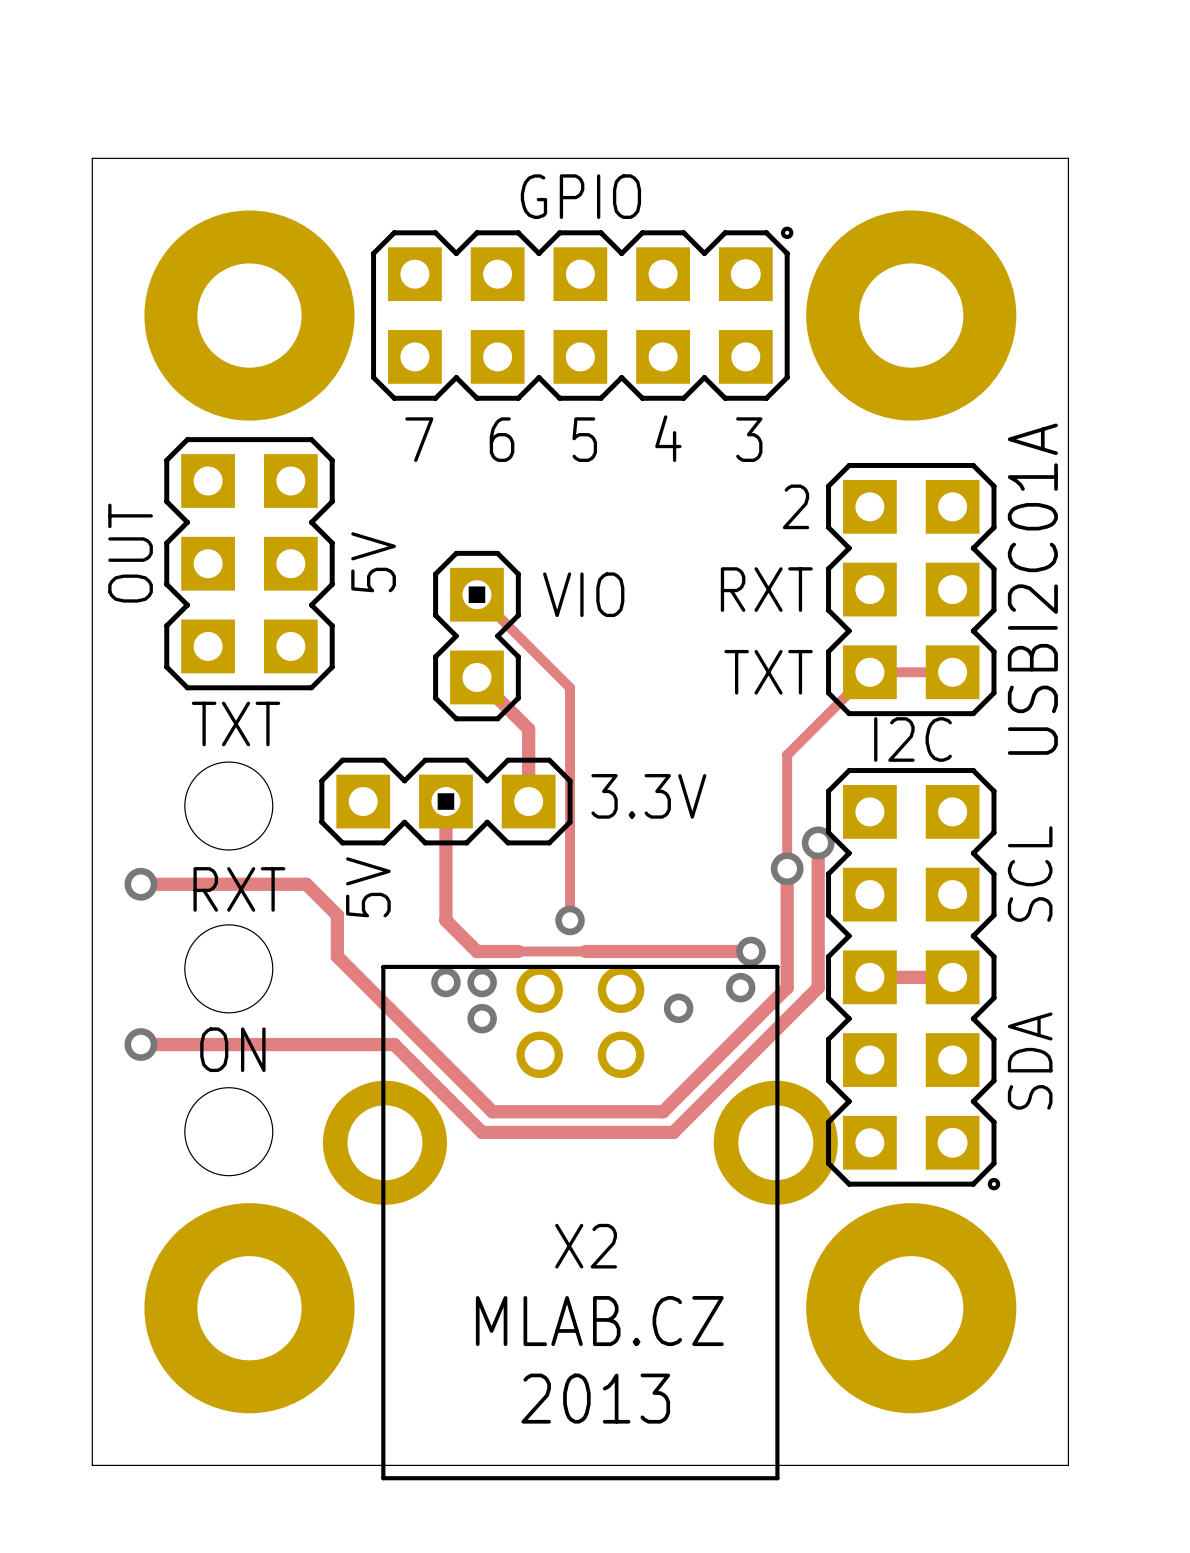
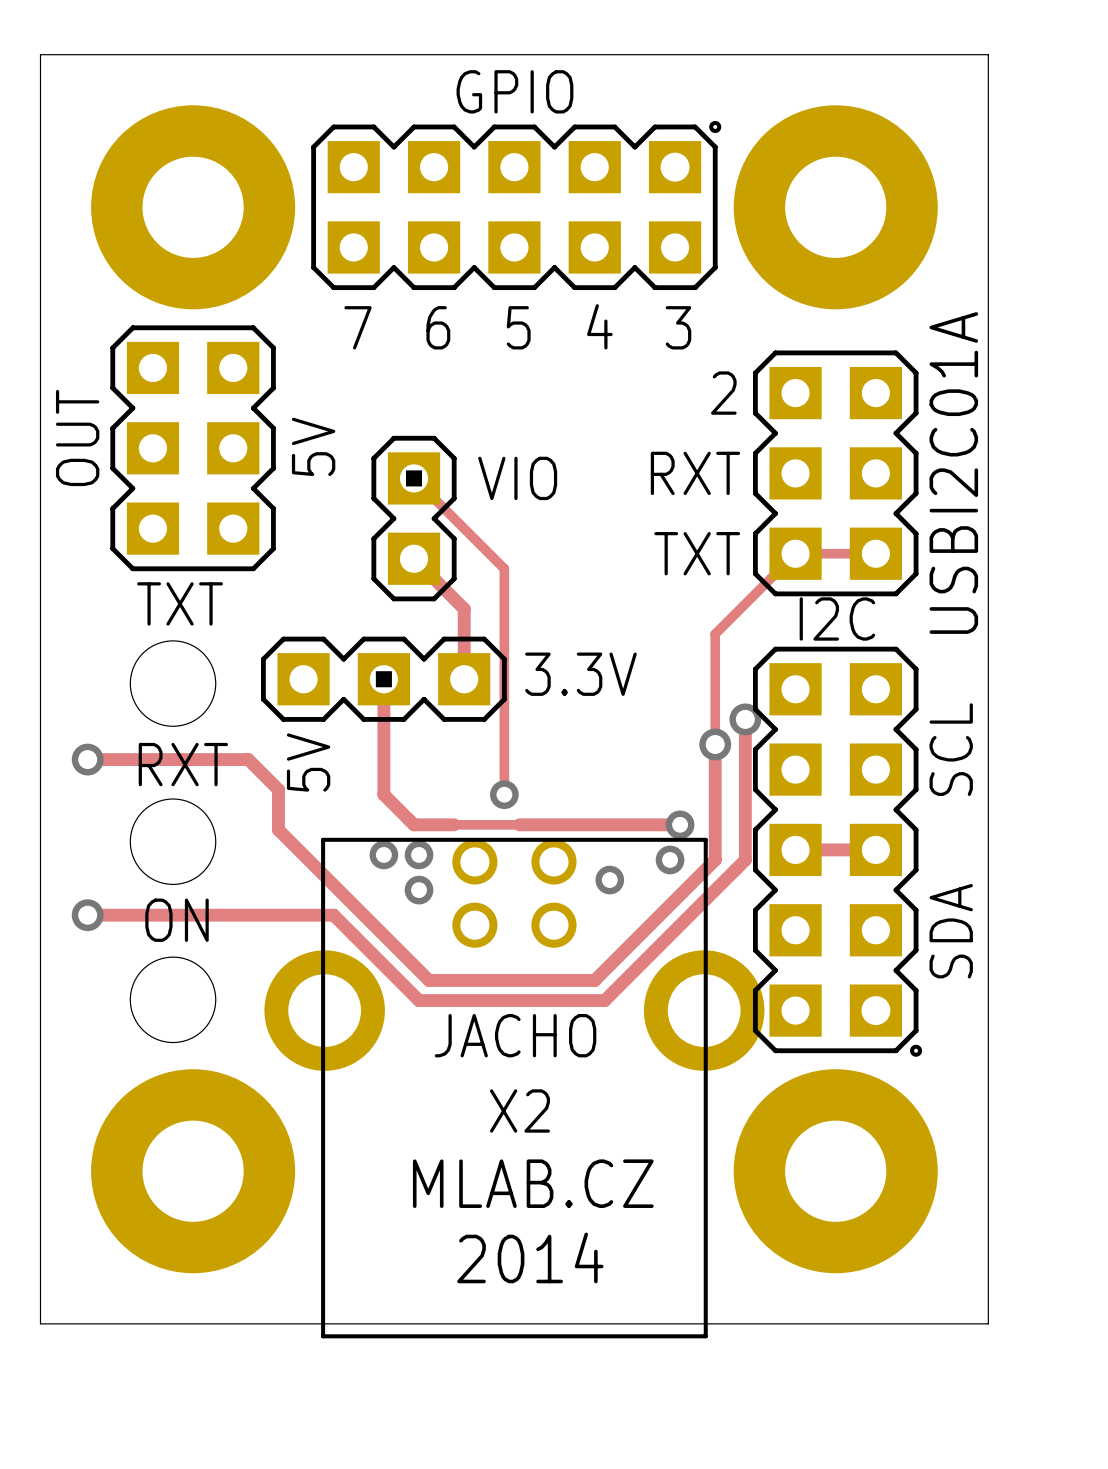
text: none -> JACHO (515, 1035)
text: 2013 (595, 1398) -> 2014 (530, 1257)

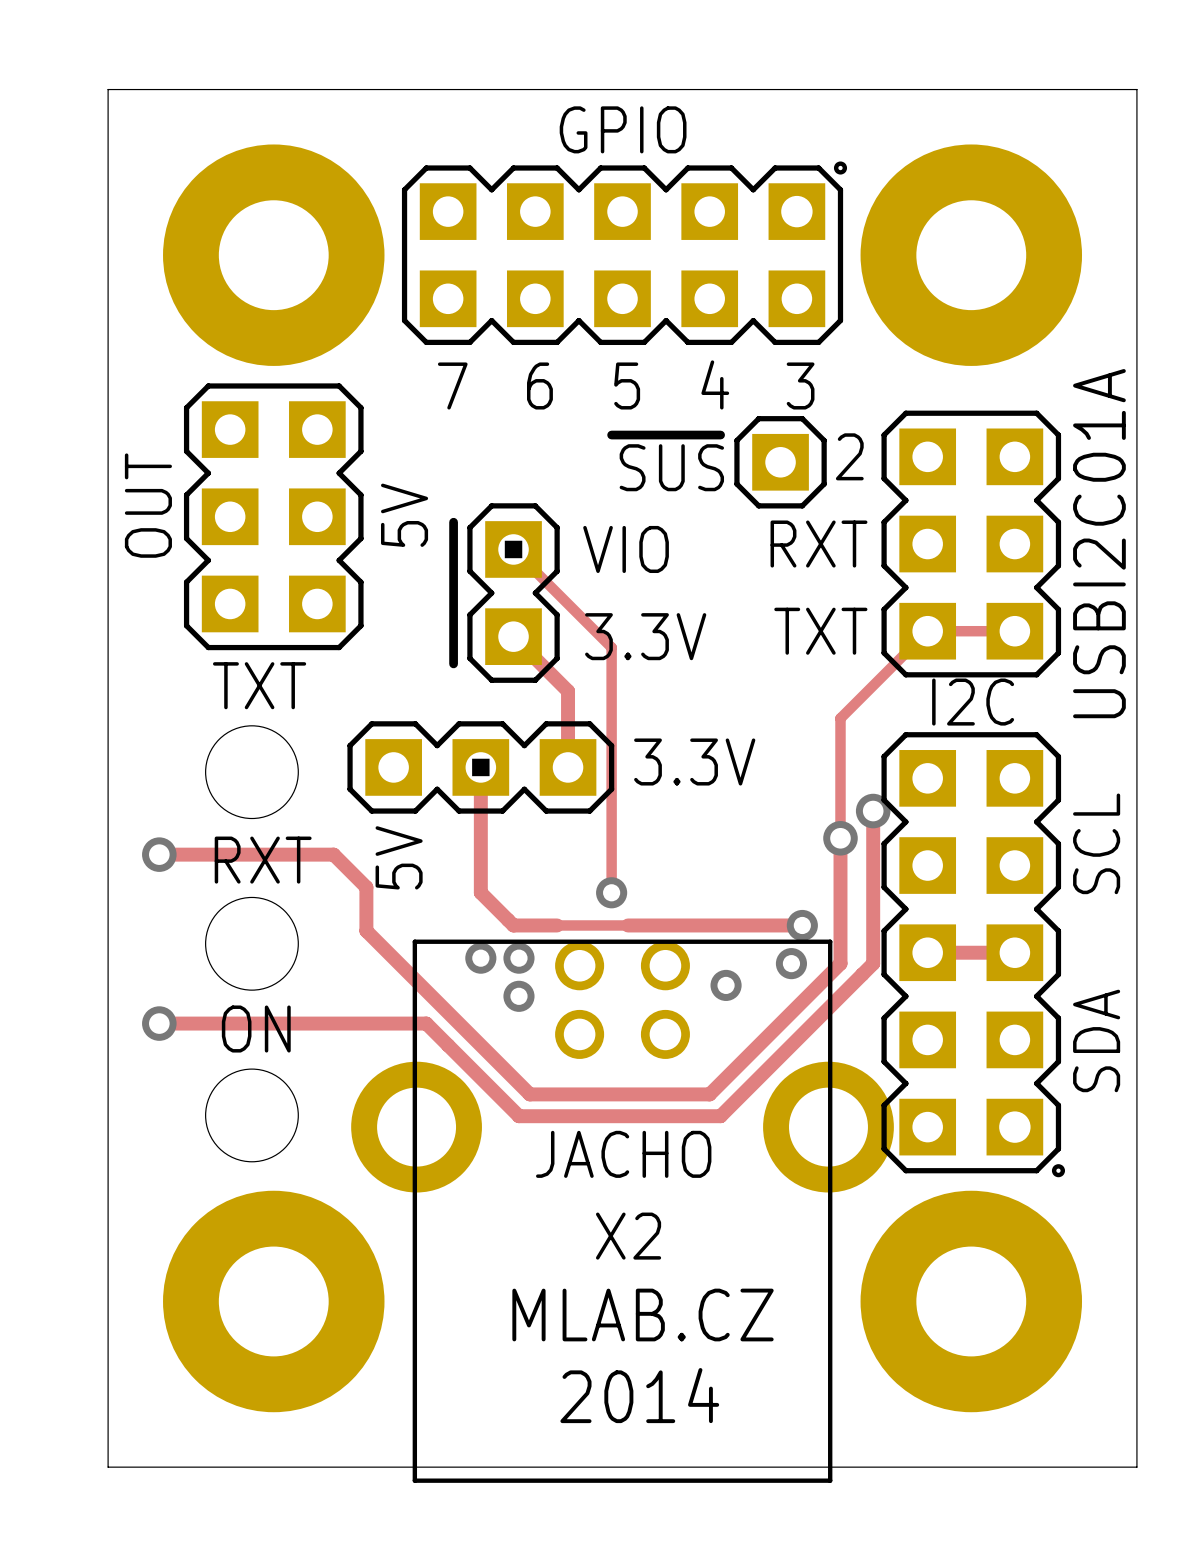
line: none -> (611, 435) (720, 435)
part: none -> (780, 462)
text: none -> SUS (671, 467)
line: none -> (453, 522) (453, 663)
text: none -> 3.3V (645, 636)

